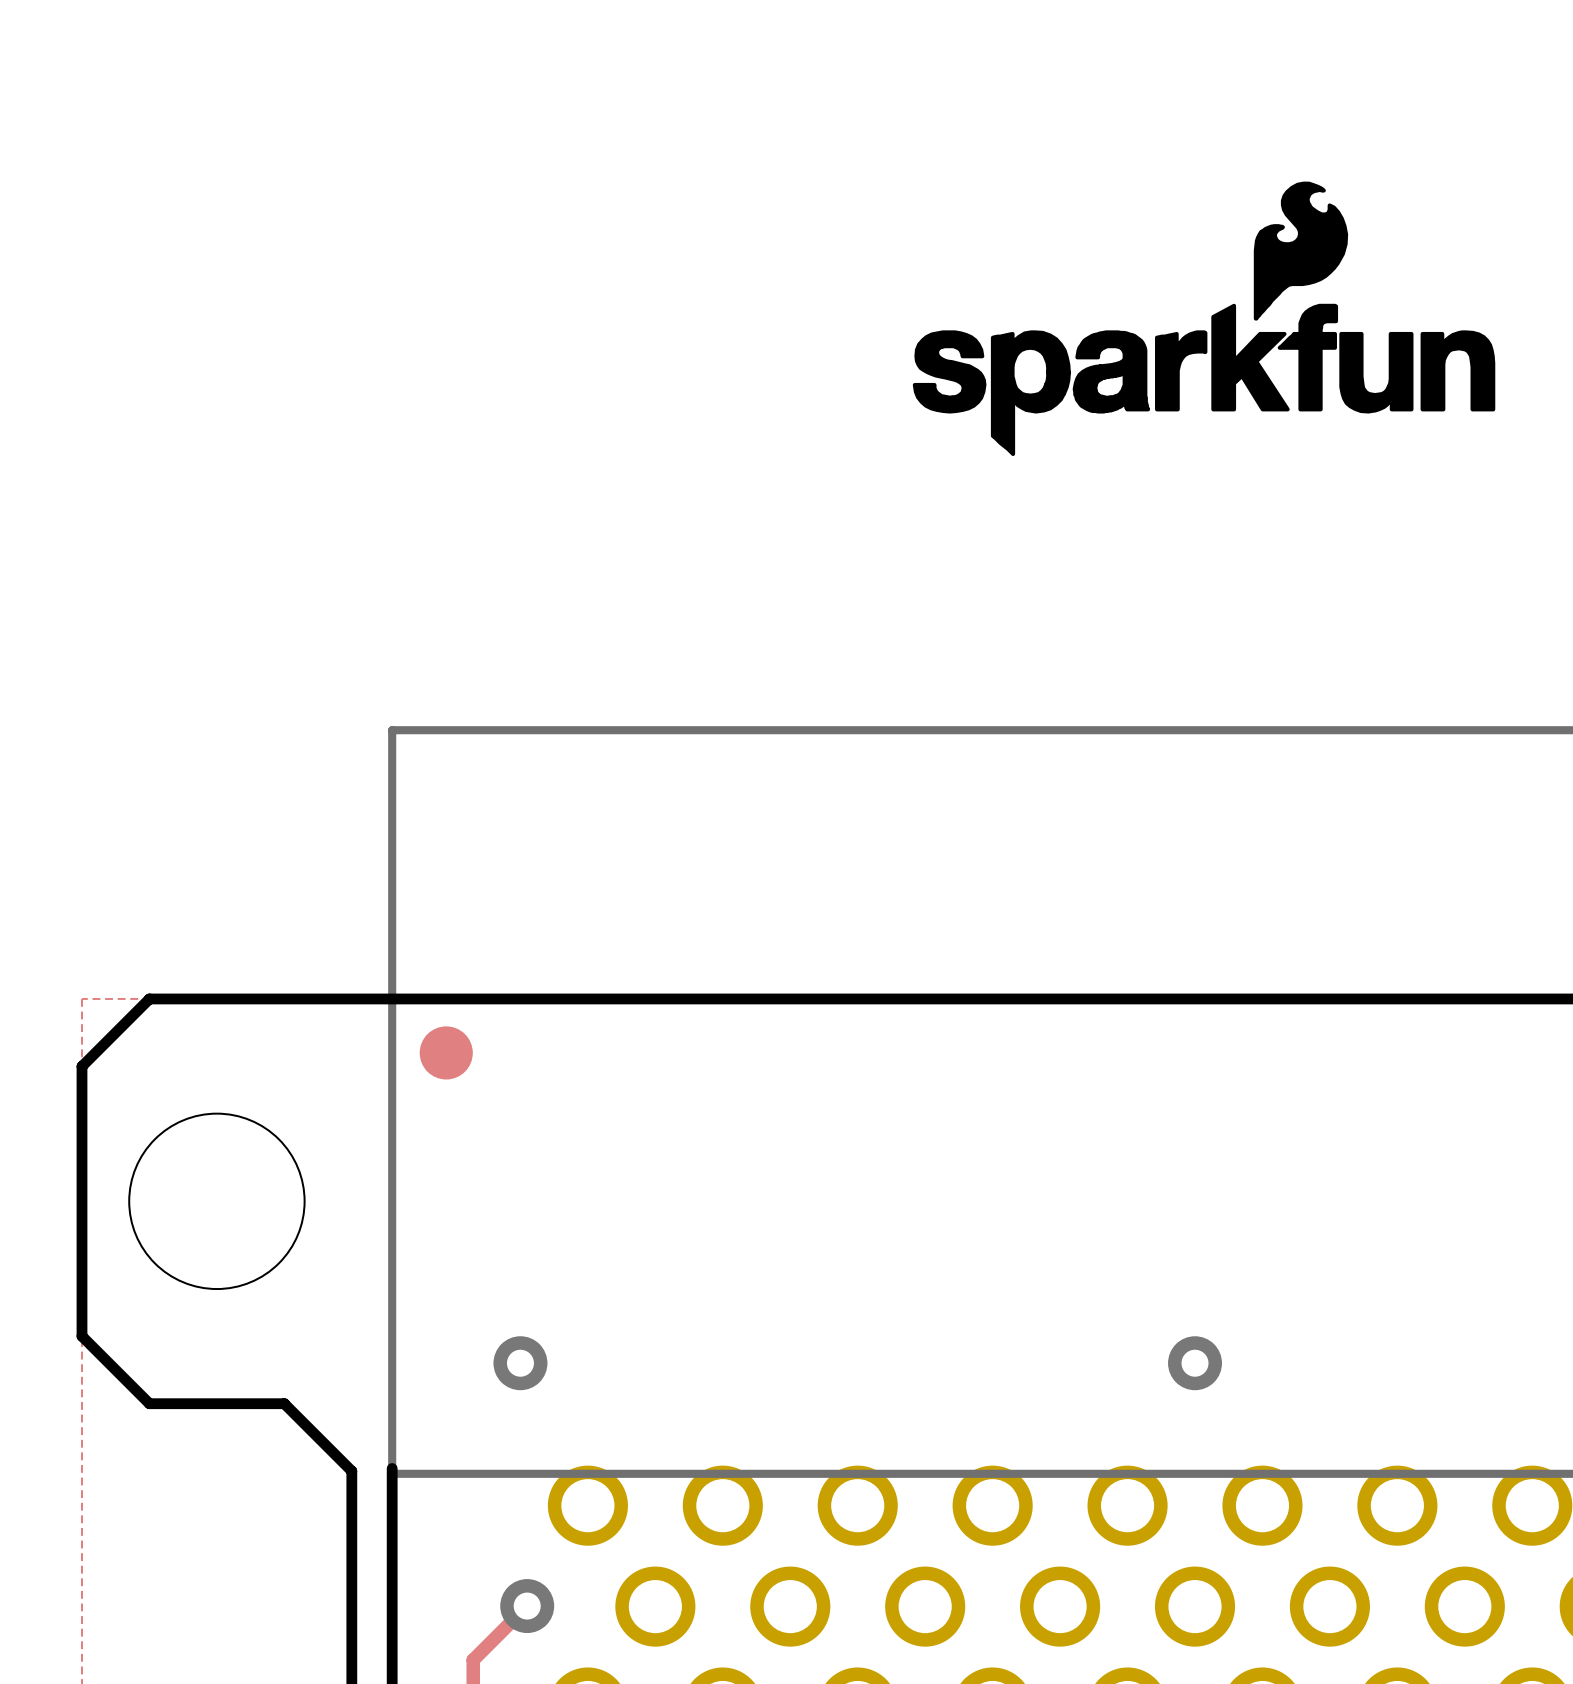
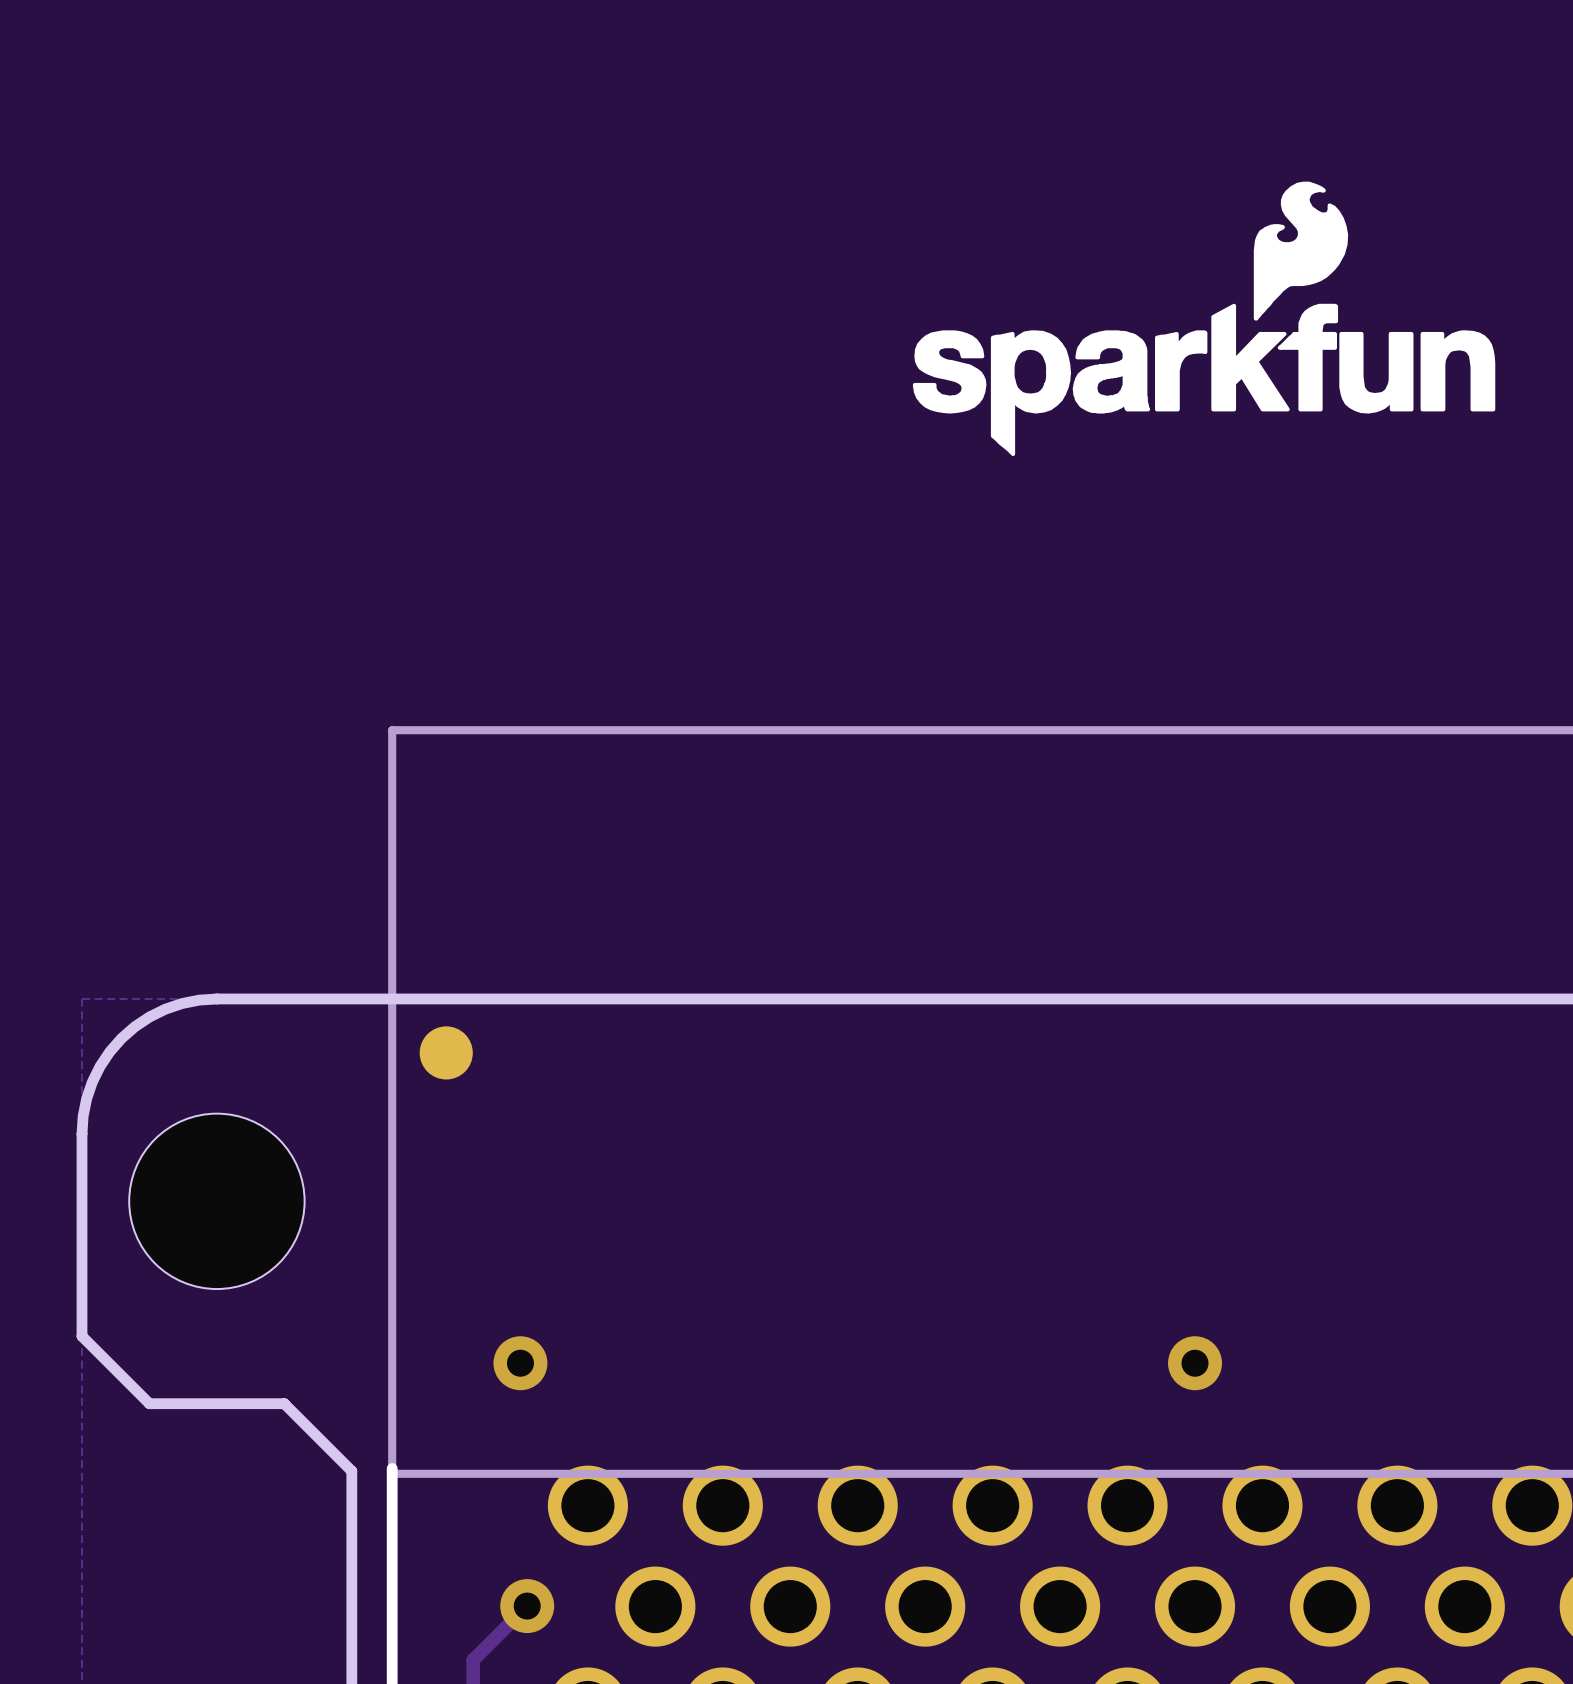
board edge: (216, 998) (149, 998) (81, 1066) (81, 1133) -> (216, 998) (181, 1003) (165, 1009) (134, 1026) (121, 1038) (109, 1051) (92, 1082) (86, 1098) (81, 1133)

